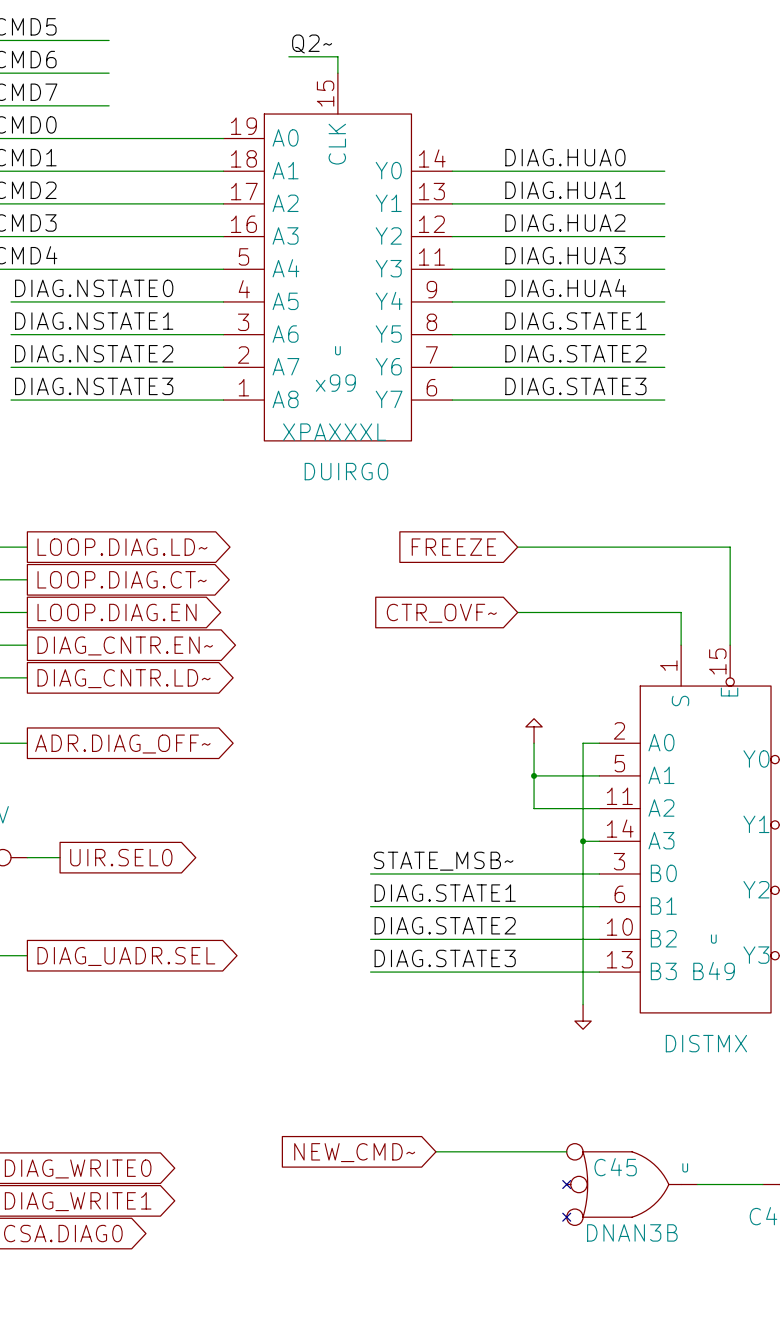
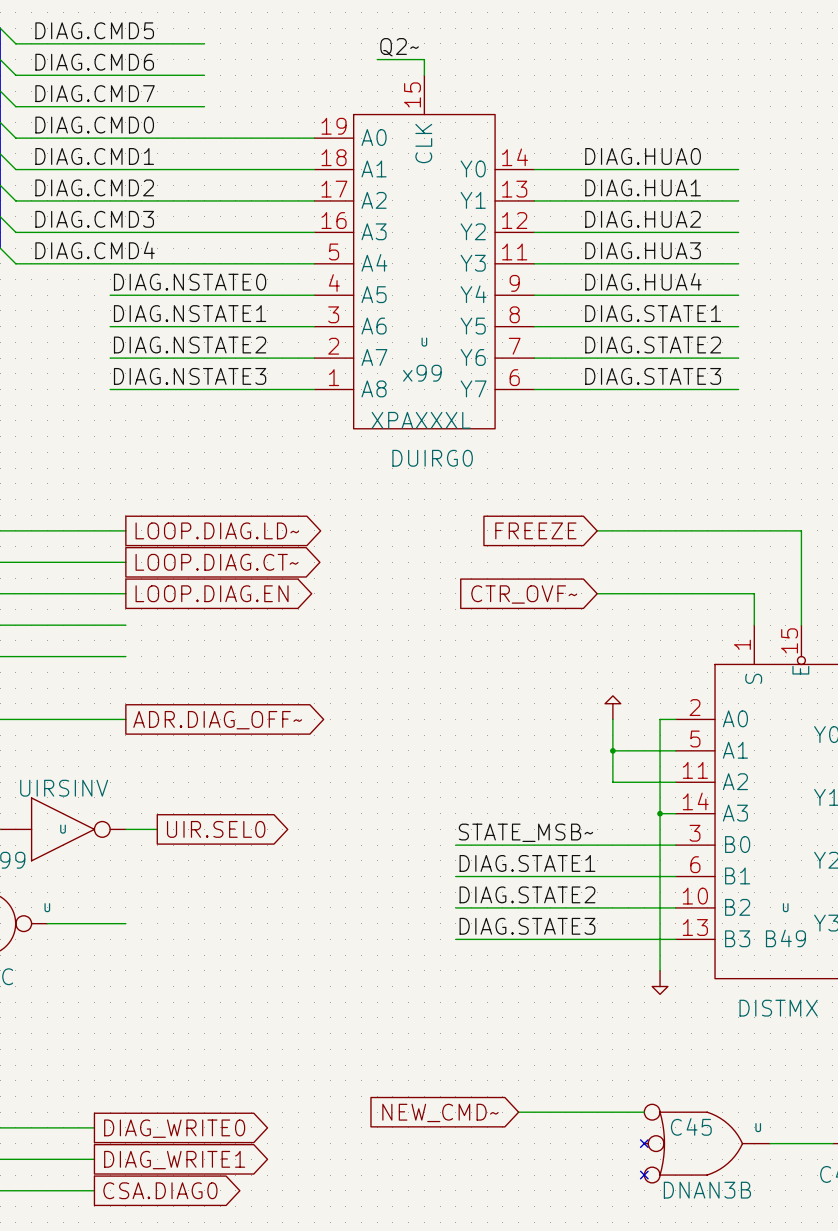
global label: DIAG_CNTR.EN~ (125, 645) -> none
global label: DIAG_CNTR.LD~ (124, 678) -> none
global label: DIAG_UADR.SEL (126, 956) -> none

